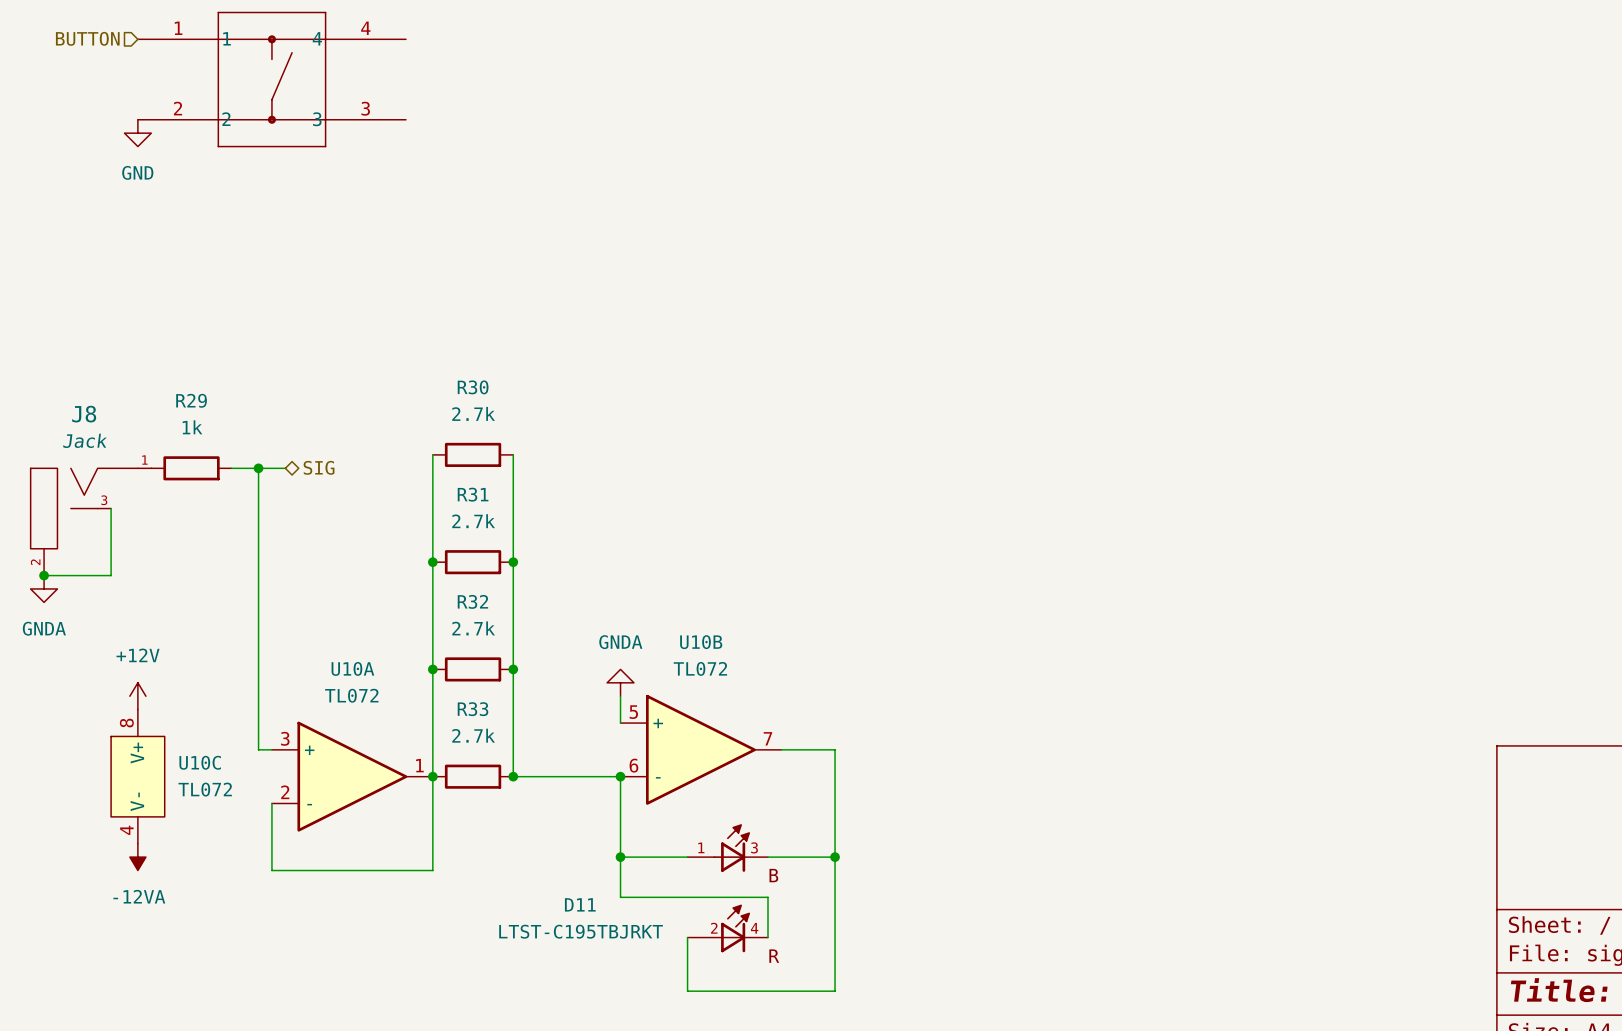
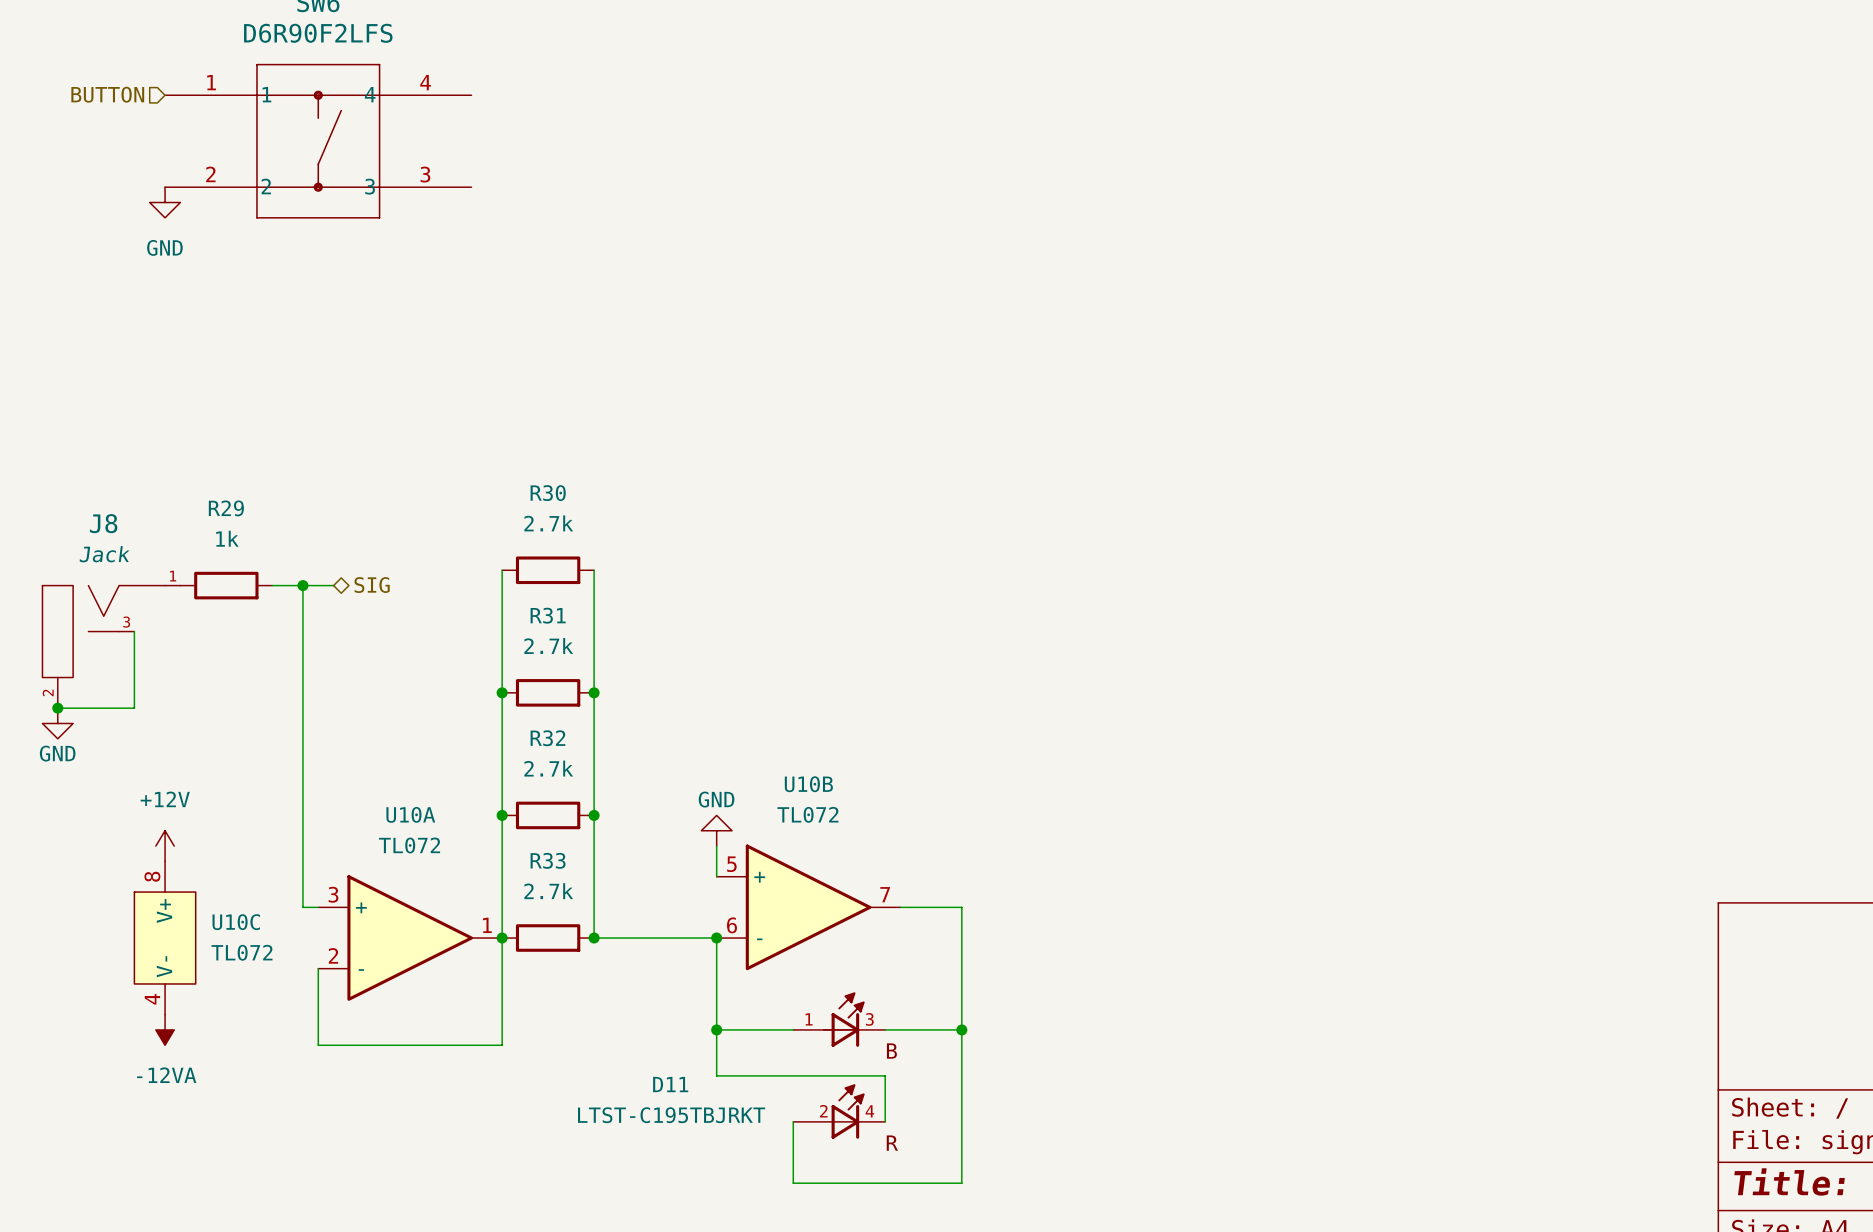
power symbol: GNDA (44, 588) -> GND (57, 723)
power symbol: GNDA (620, 682) -> GND (716, 830)

